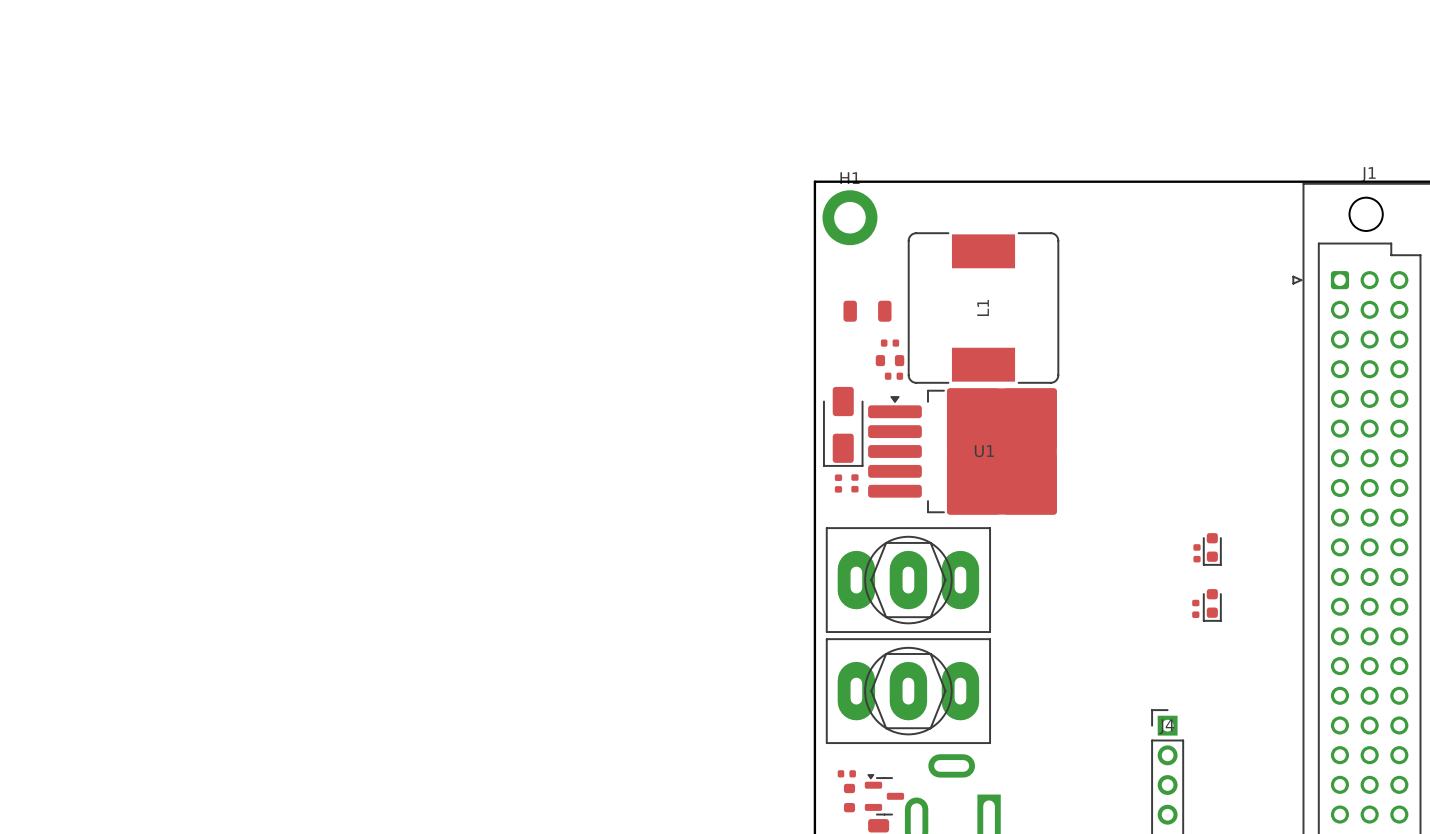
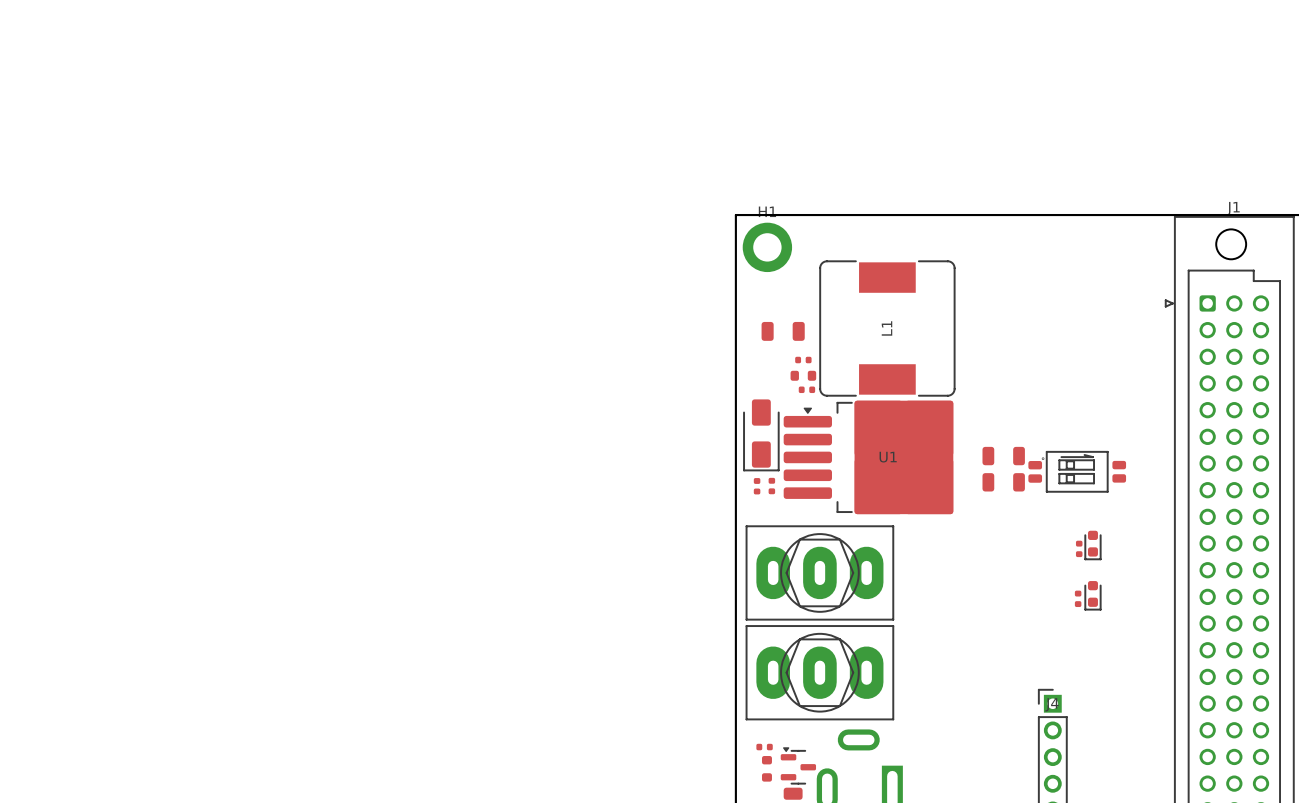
part: none -> (1003, 456)
part: none -> (1077, 471)
part: none -> (1003, 482)

